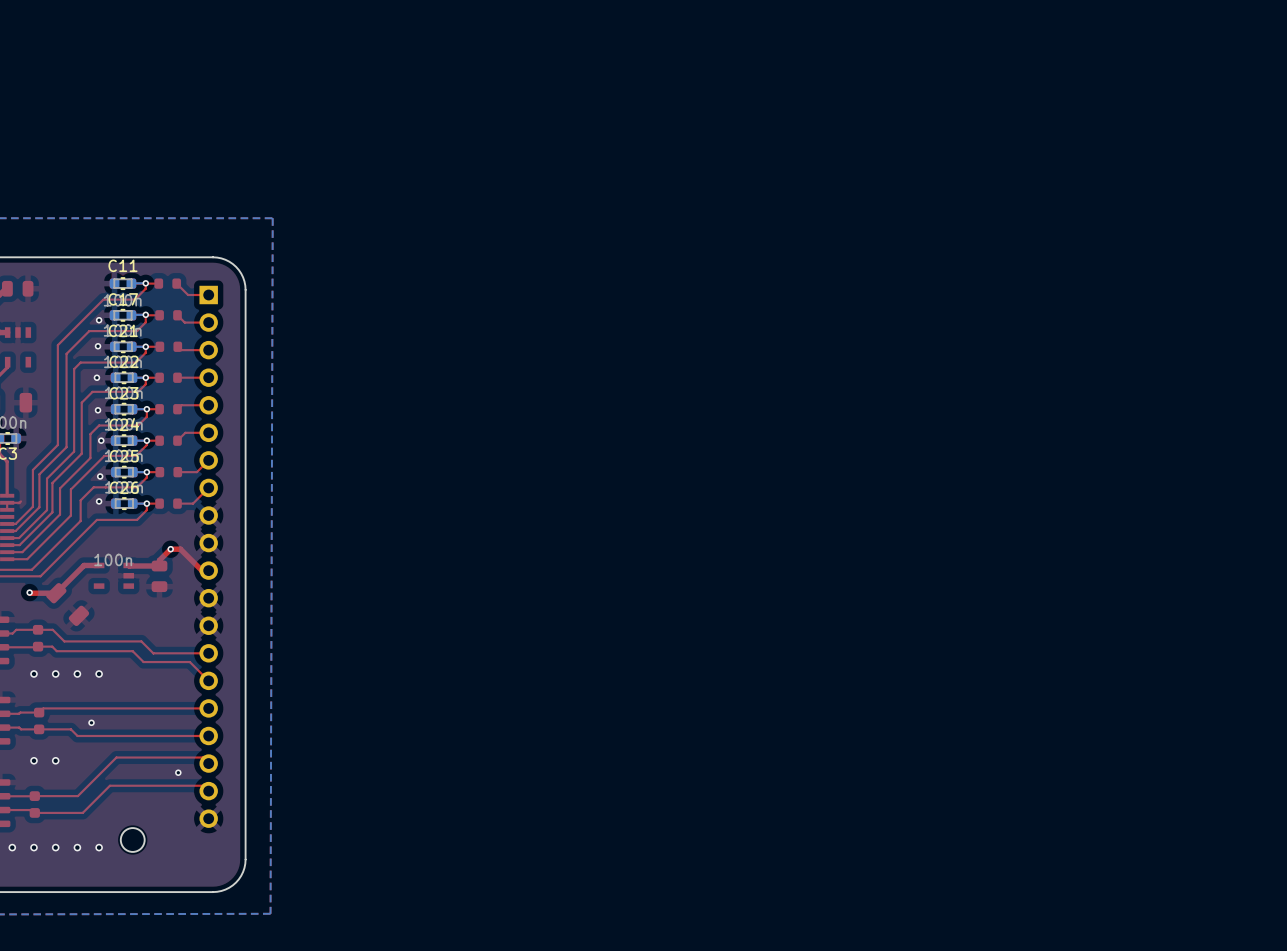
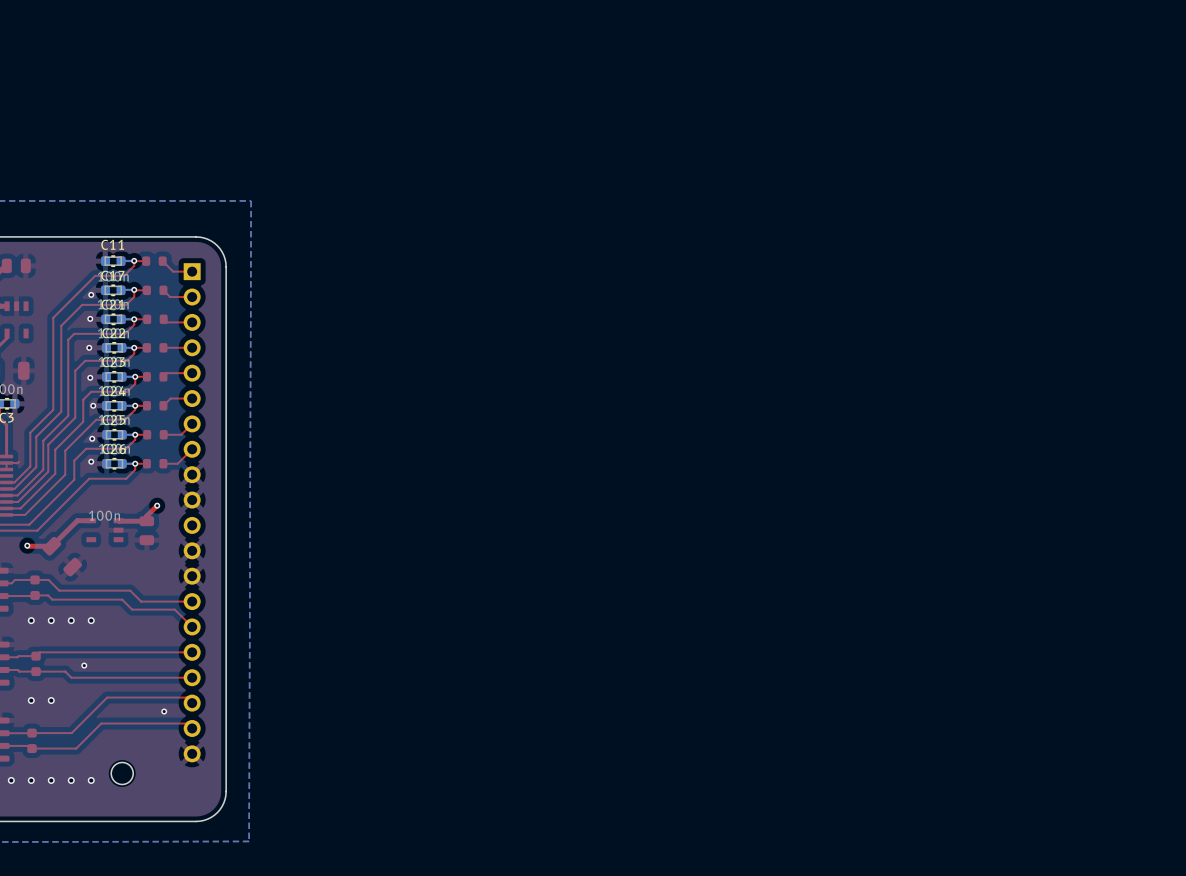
top track: (170, 549) (180, 549) (201, 570) (208, 570) -> none

